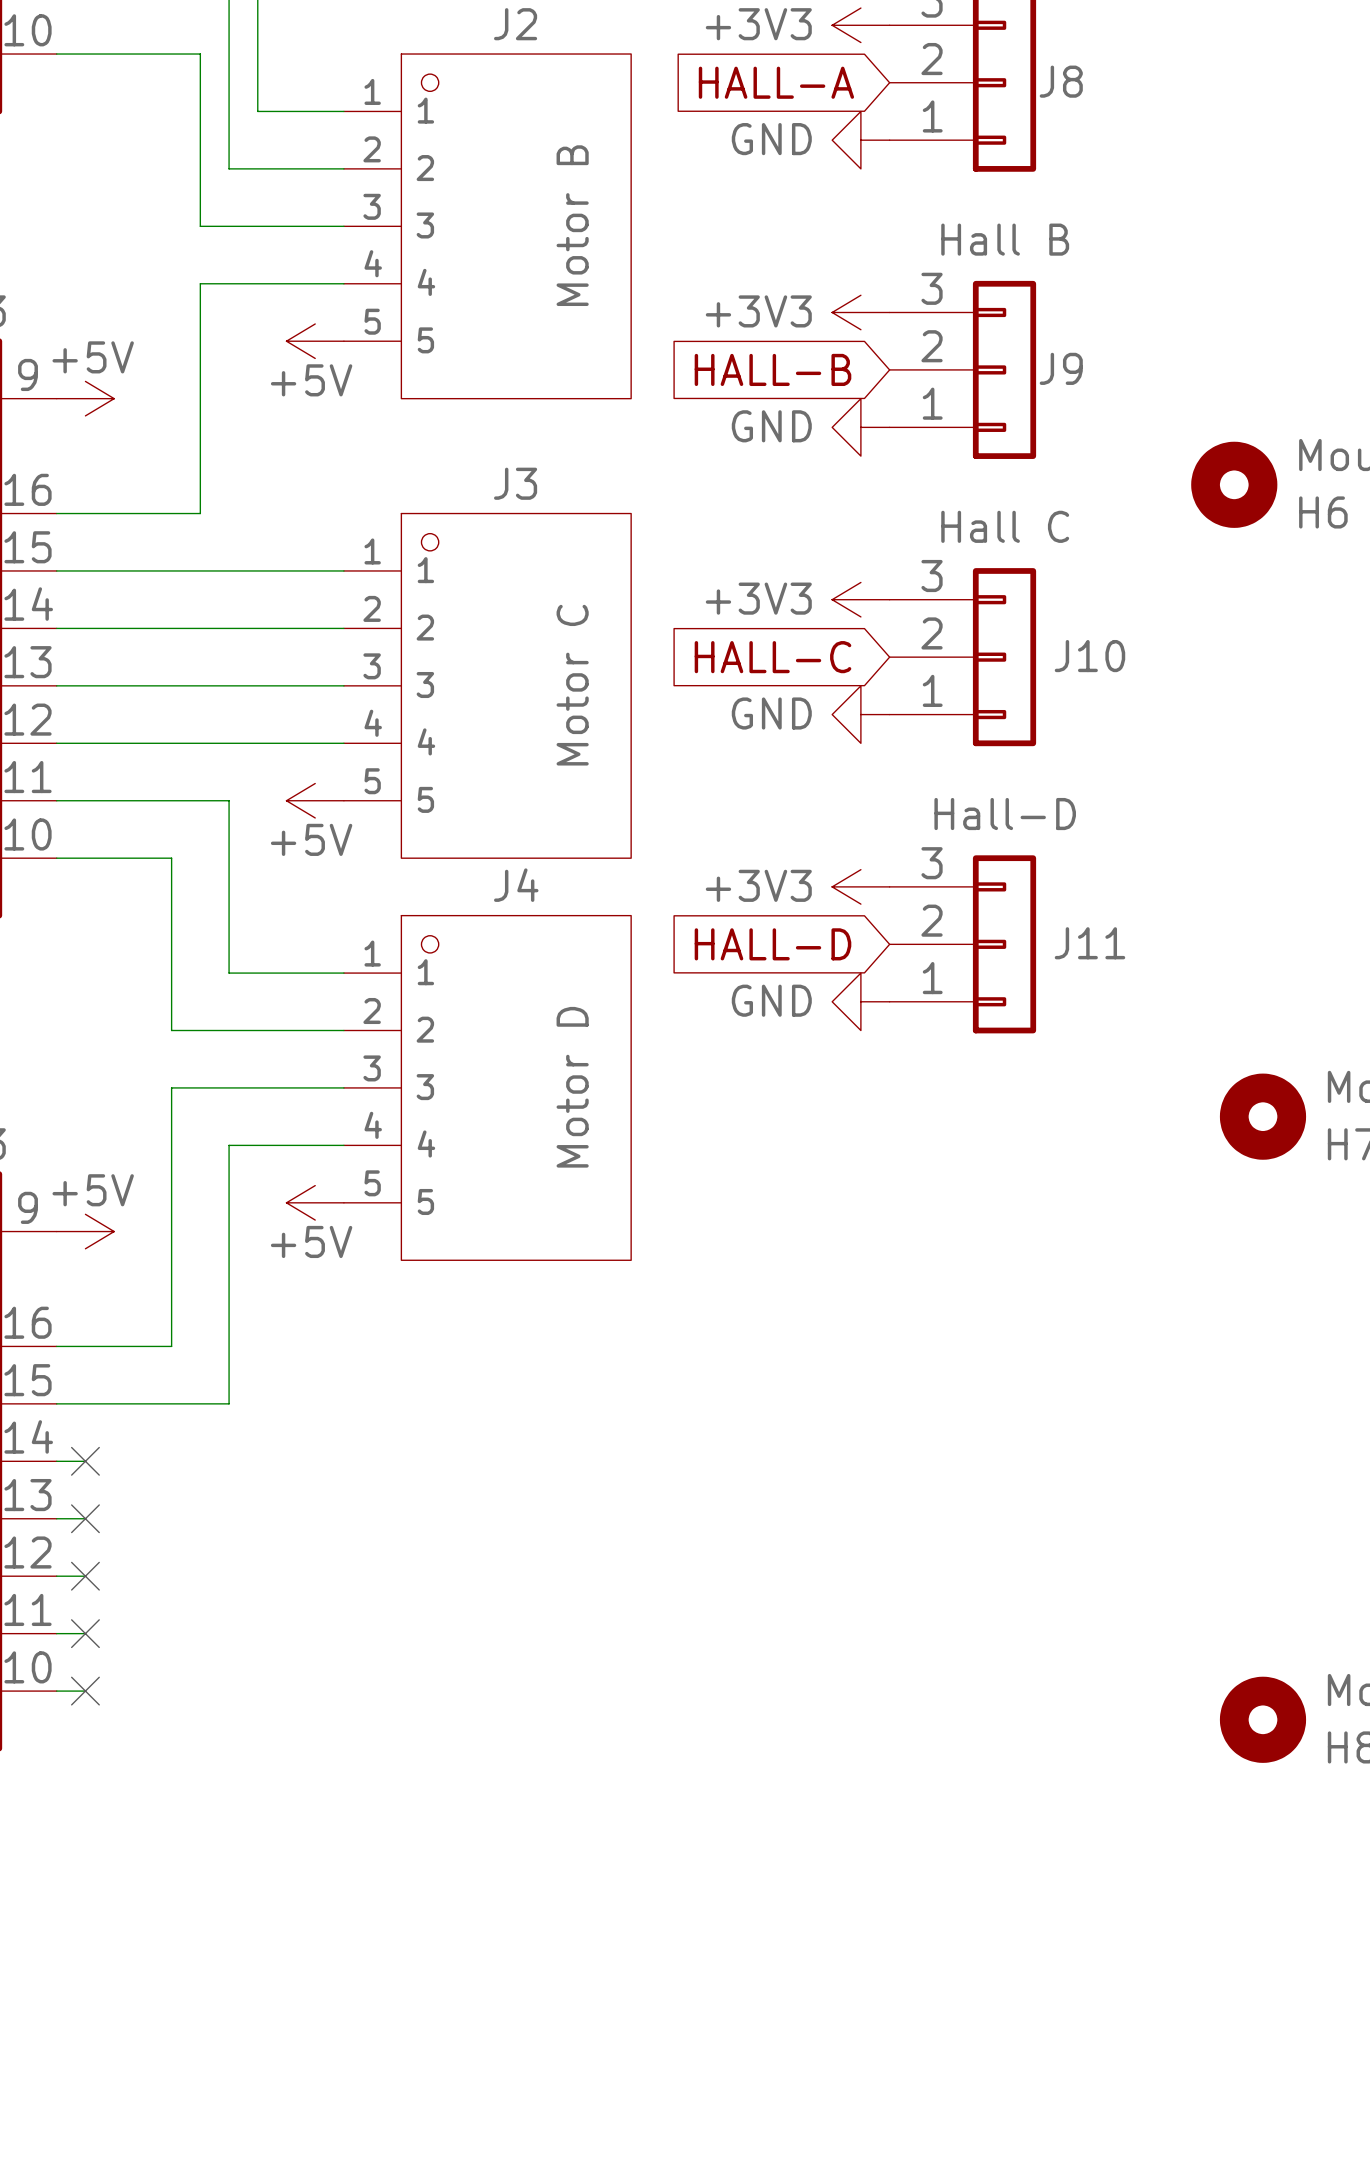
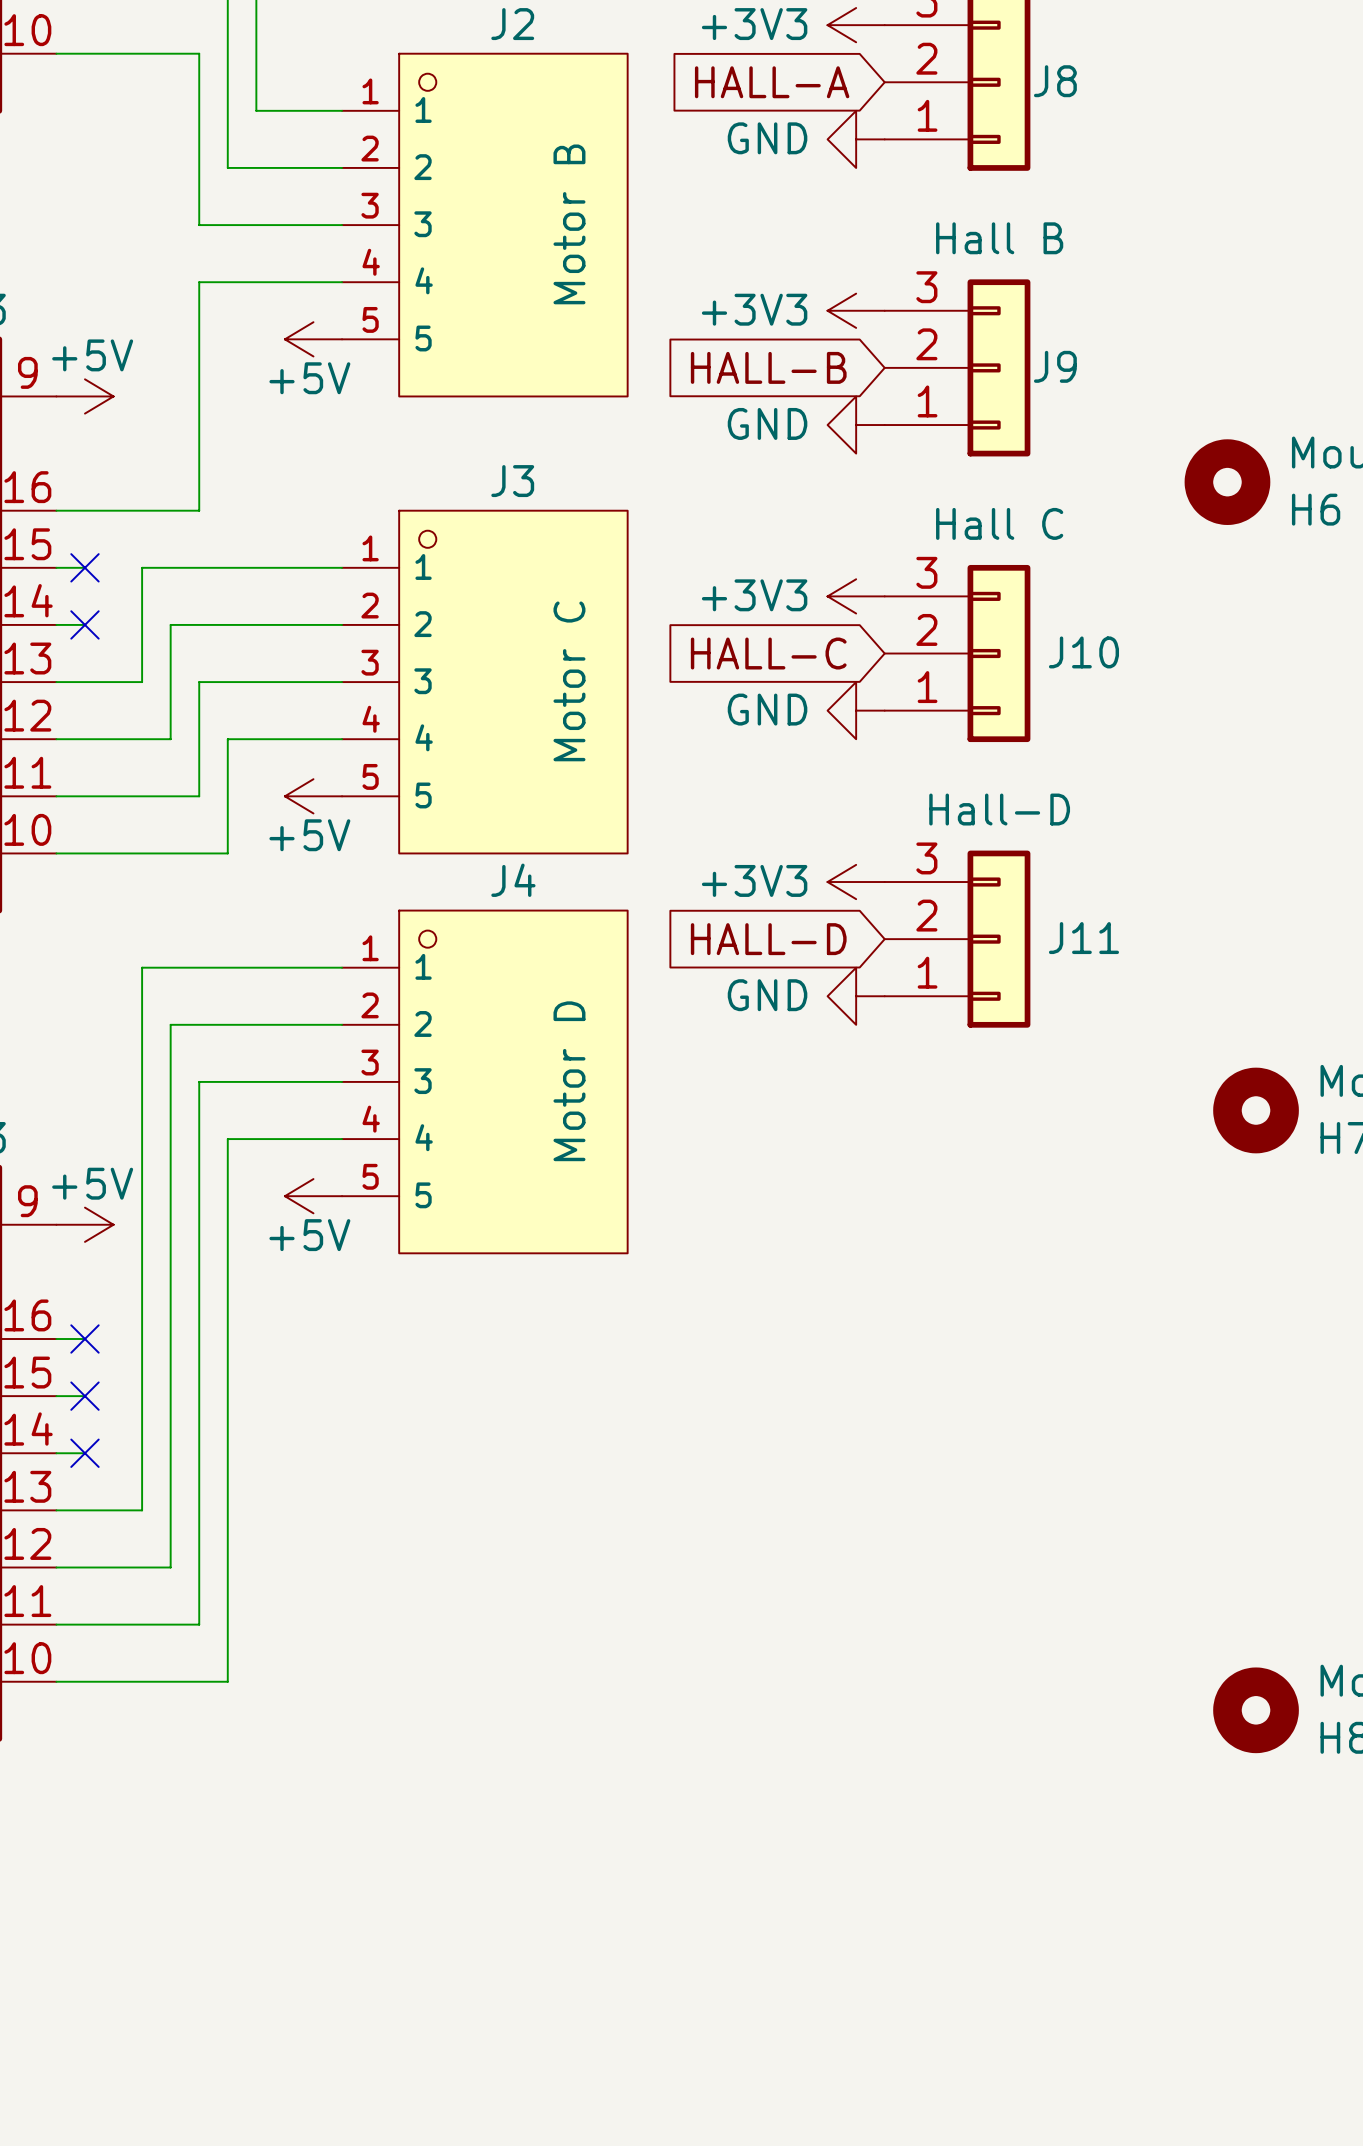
wire: (85, 570) (142, 570) -> (142, 682) (142, 567)
no-connect mark: none -> (84, 567)
wire: (85, 628) (171, 628) -> none
no-connect mark: none -> (84, 624)
wire: (142, 685) (200, 685) -> (199, 796) (199, 682)
wire: (171, 743) (229, 743) -> (170, 739) (170, 624)
wire: (200, 800) (229, 800) -> (227, 739) (227, 796)
wire: (171, 858) (171, 1030) -> none
wire: (229, 858) (229, 973) -> (227, 853) (170, 853)
wire: none -> (227, 967) (142, 967) (142, 1510) (84, 1510)
wire: (171, 1087) (200, 1087) -> (170, 1081) (170, 1024)
wire: none -> (199, 1081) (199, 1624) (84, 1624)
wire: (85, 1346) (171, 1346) -> (84, 1567) (170, 1567) (170, 1339)
no-connect mark: none -> (84, 1339)
wire: (85, 1403) (229, 1403) -> (84, 1681) (227, 1681) (227, 1396)
no-connect mark: none -> (84, 1396)
no-connect mark: (85, 1518) -> none
no-connect mark: (85, 1576) -> none
no-connect mark: (85, 1633) -> none
no-connect mark: (85, 1691) -> none

